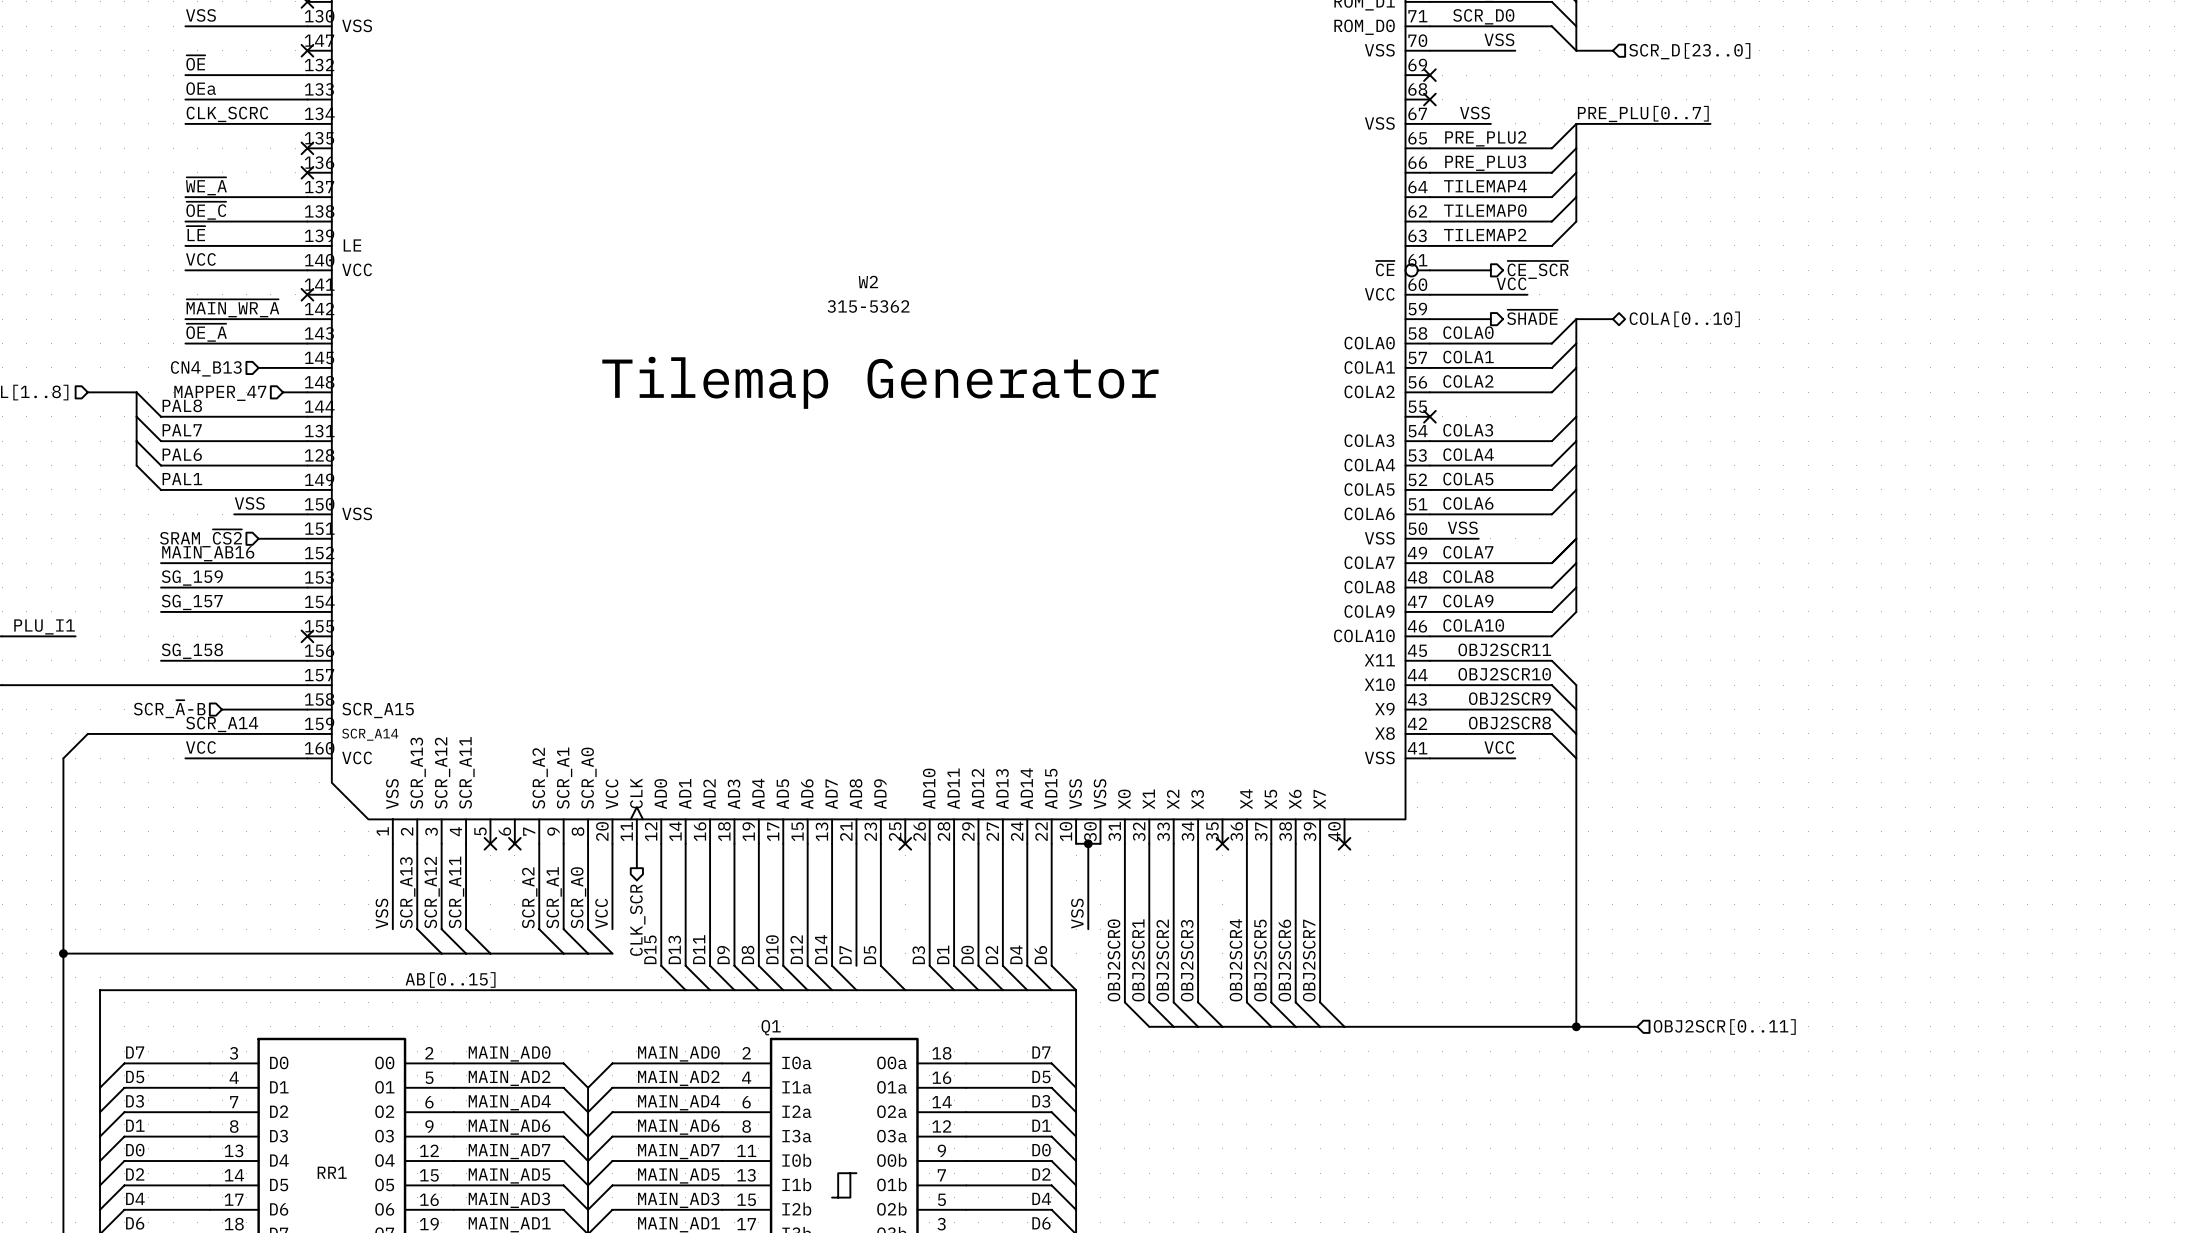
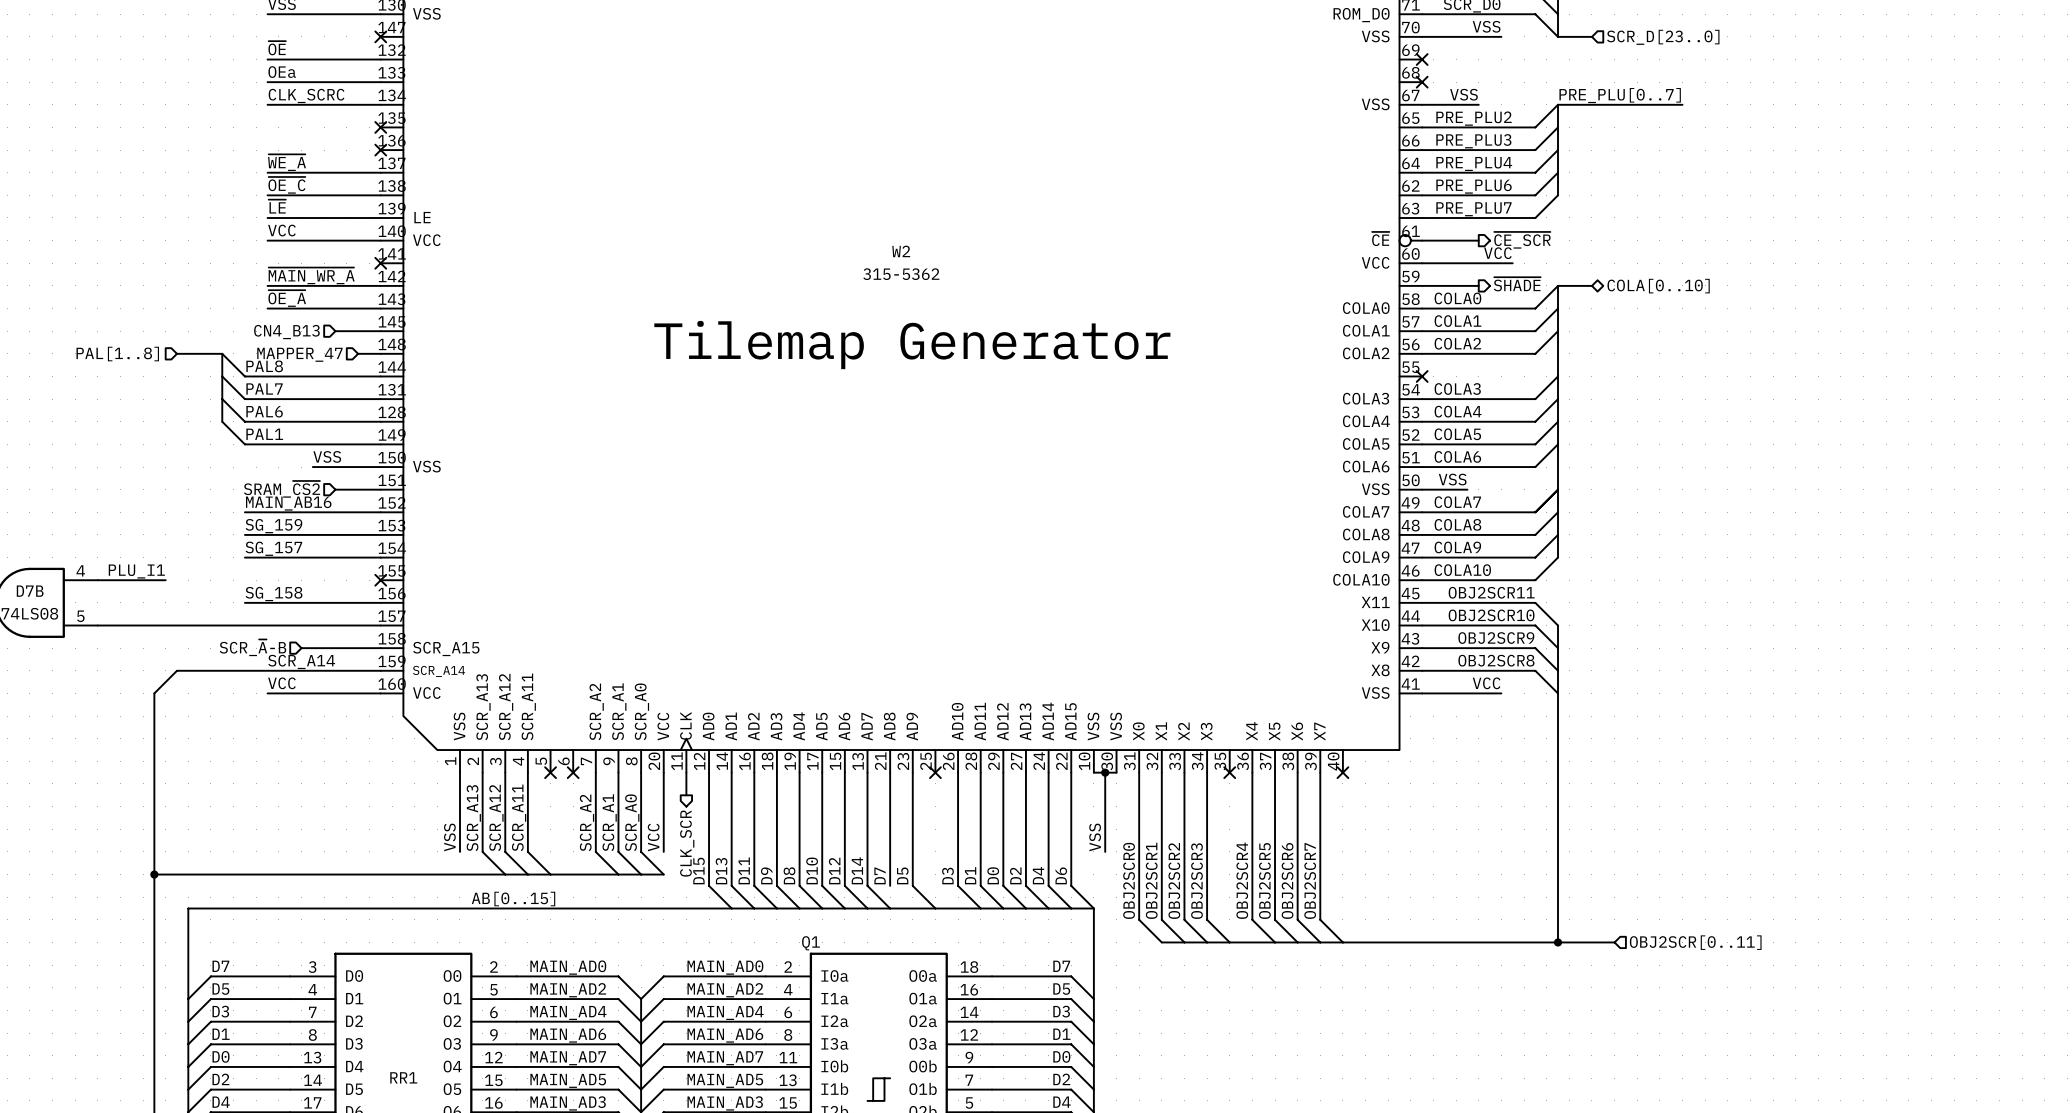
label: TILEMAP4 (1485, 186) -> PRE_PLU4 (1474, 163)
label: TILEMAP0 (1485, 210) -> PRE_PLU6 (1474, 186)
label: TILEMAP2 (1485, 234) -> PRE_PLU7 (1473, 209)

